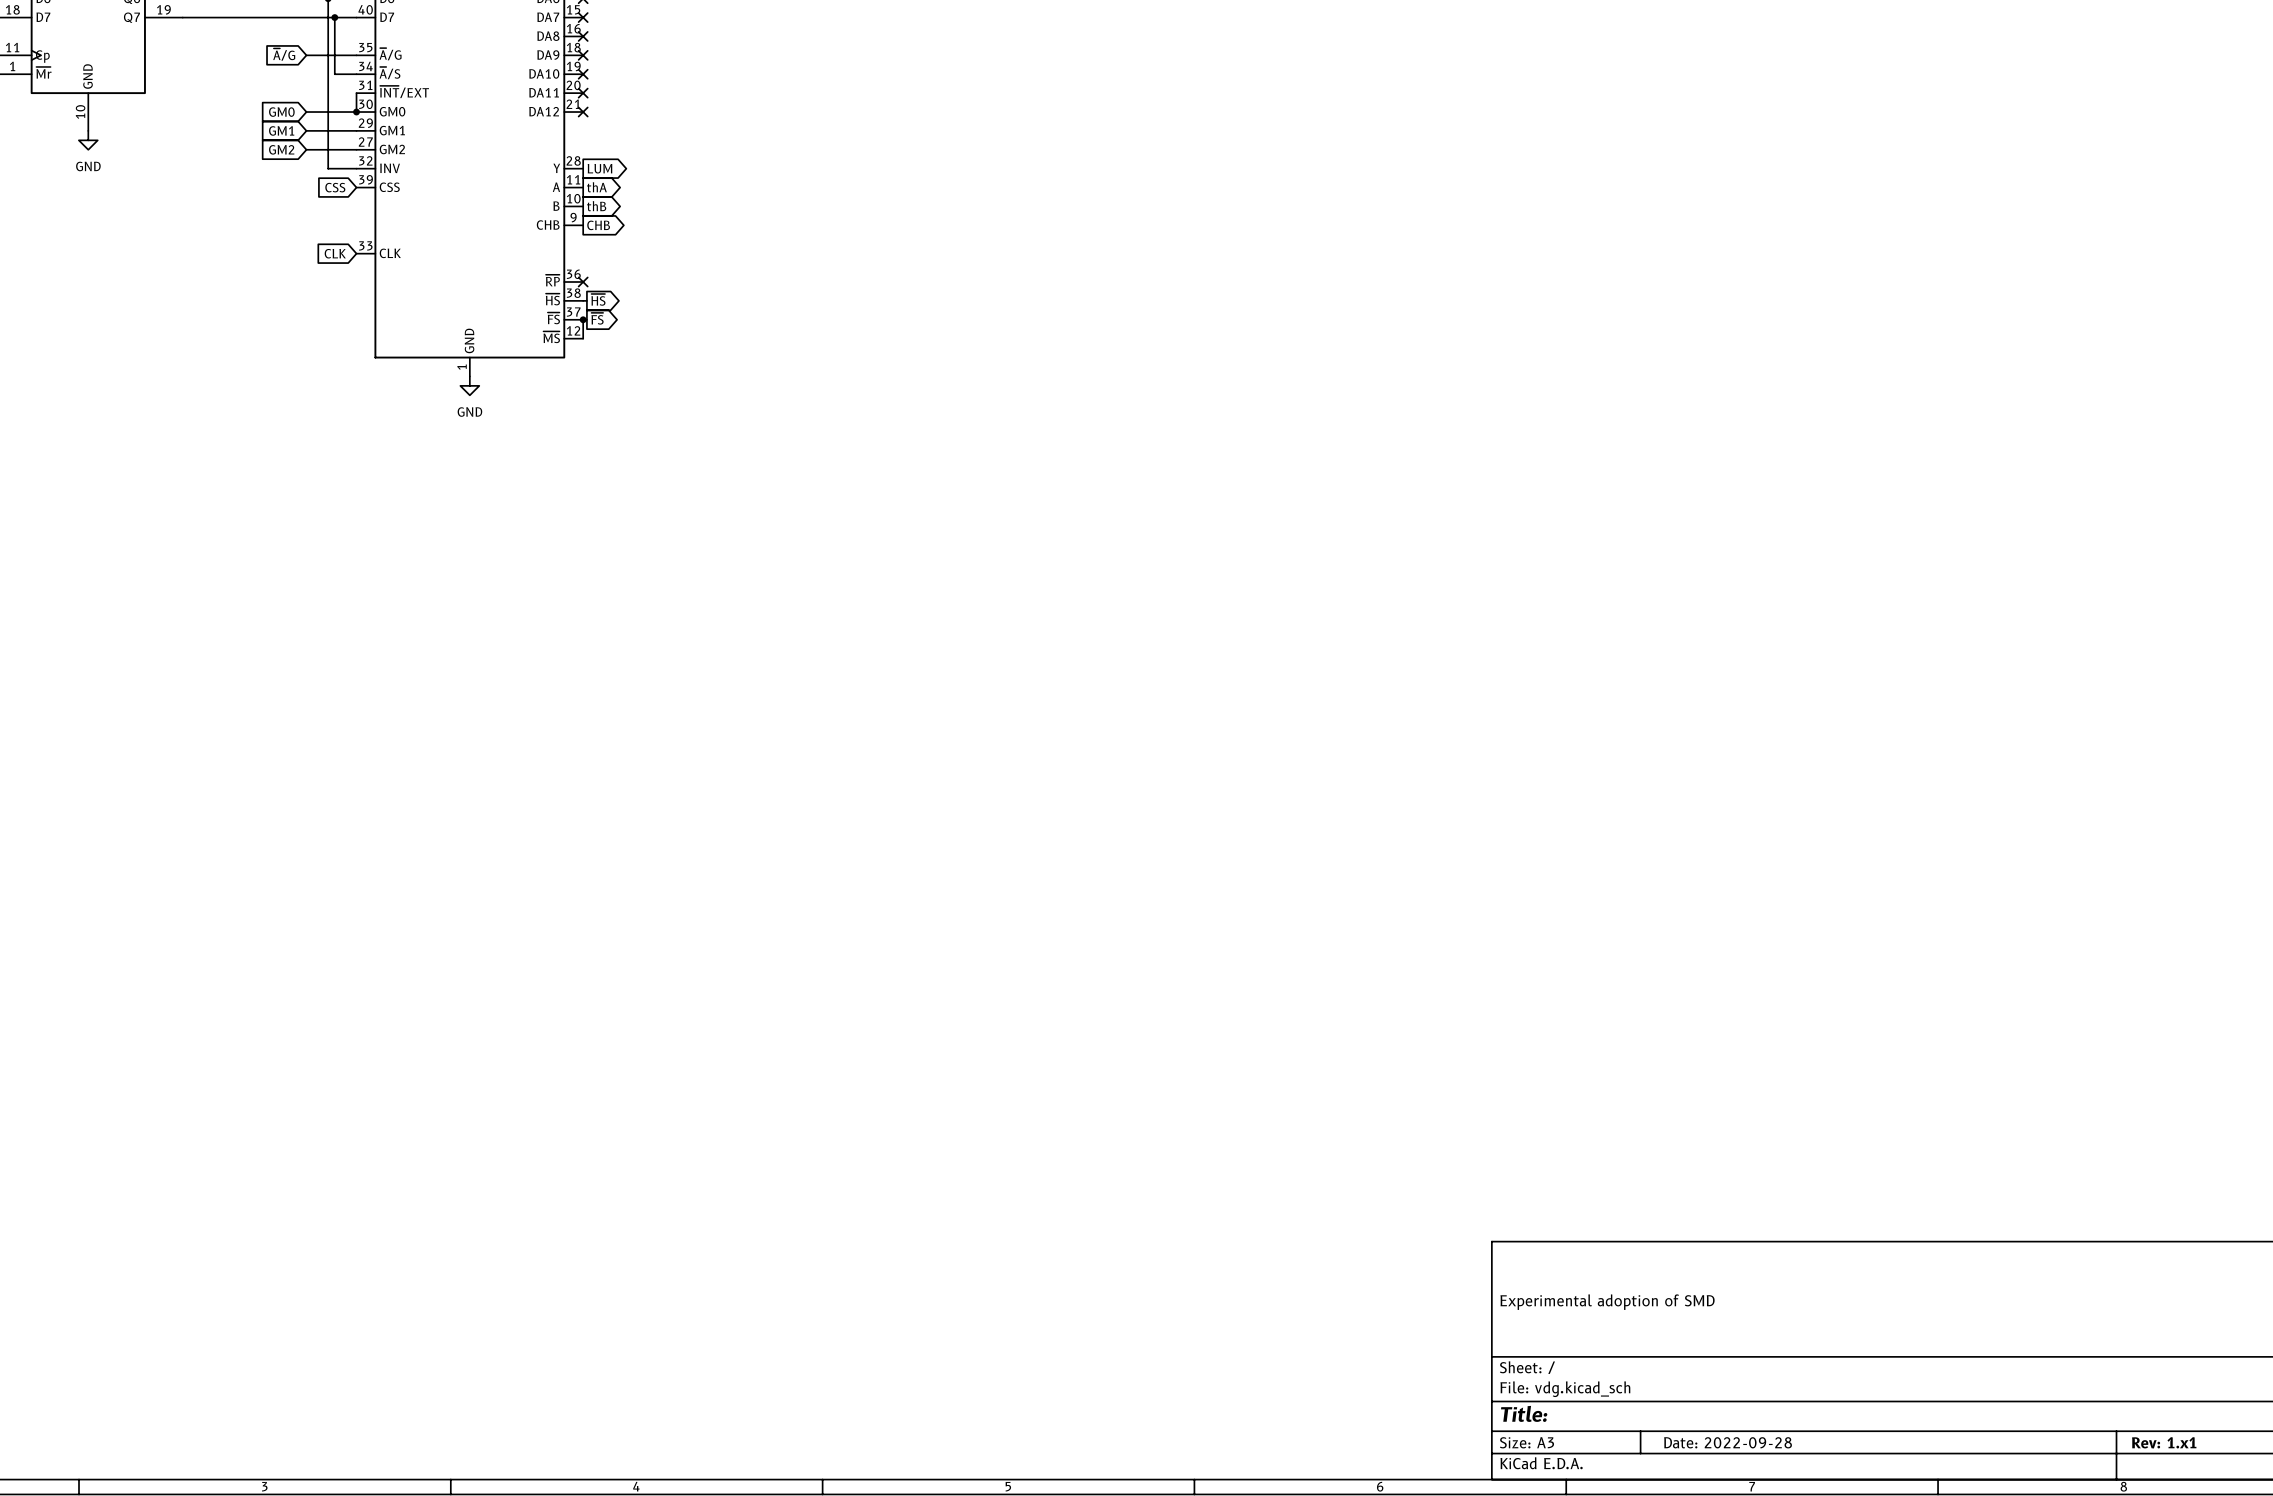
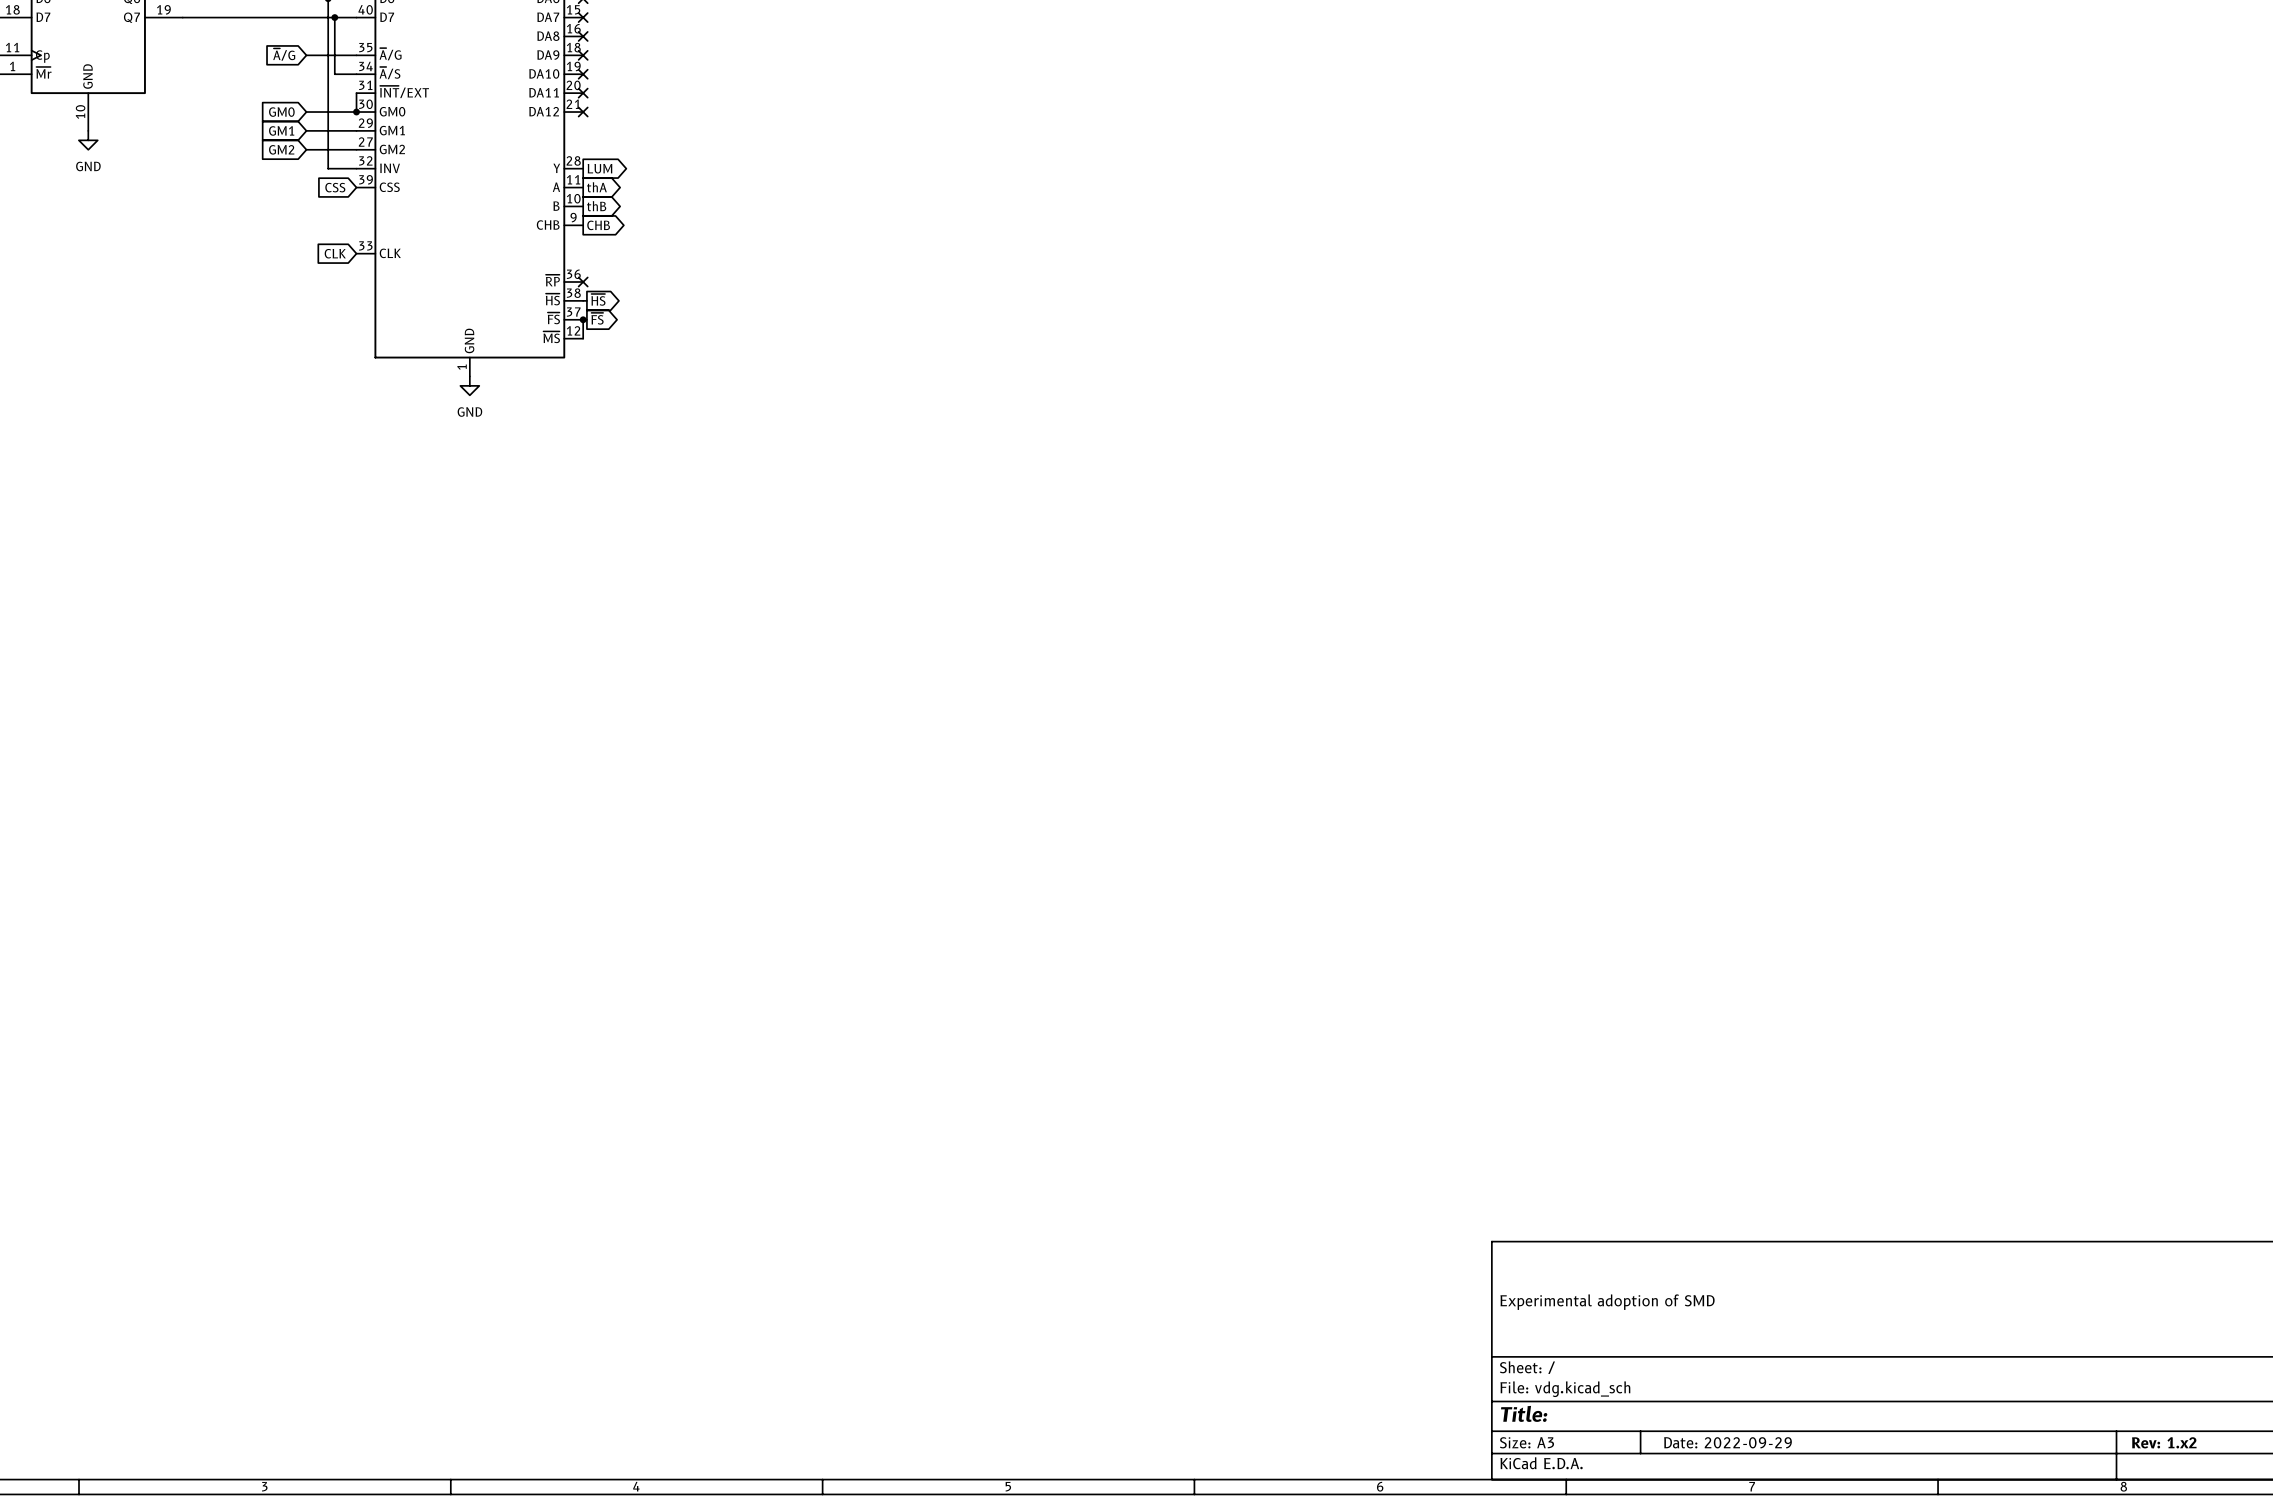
title block: Date: 2022-09-28 (1728, 1442) -> Date: 2022-09-29 (1727, 1442)
title block: Rev: 1.x1 (2164, 1442) -> Rev: 1.x2 (2164, 1442)

